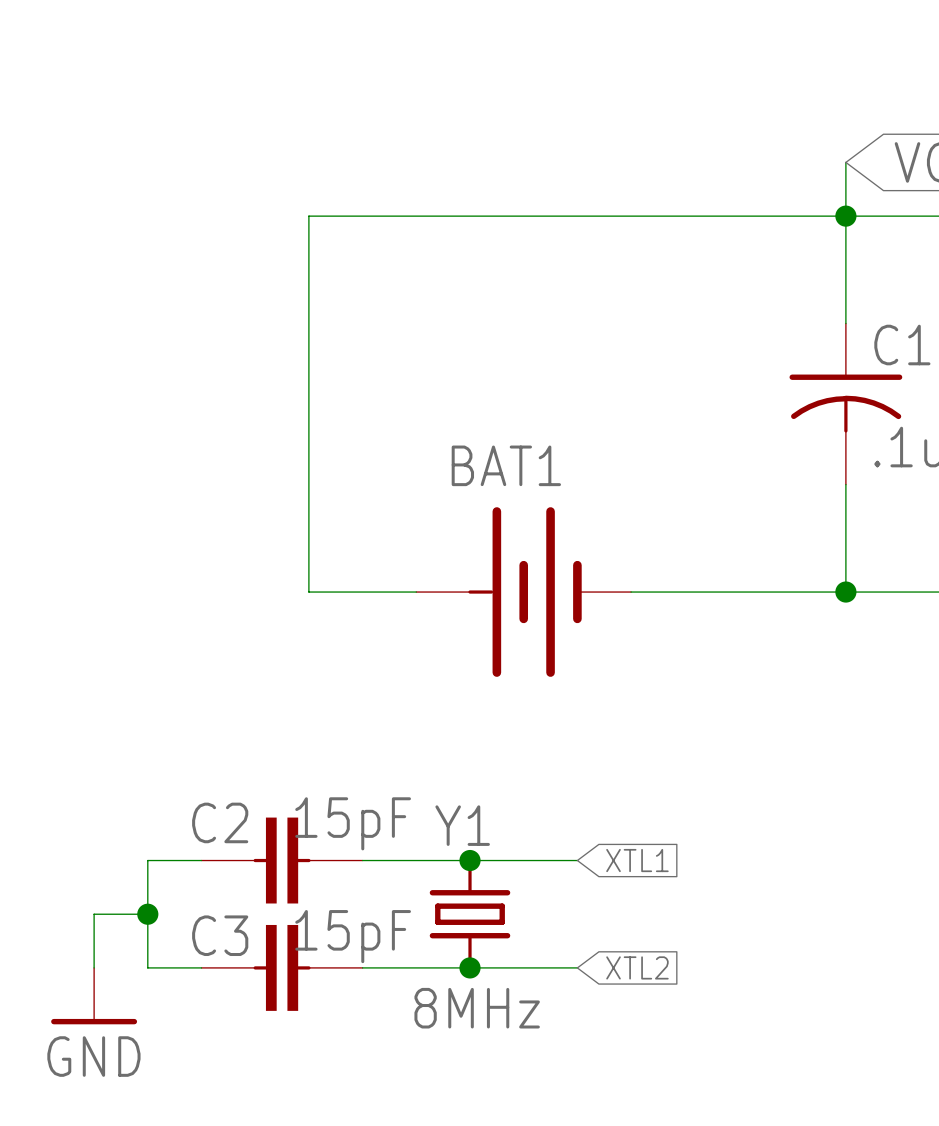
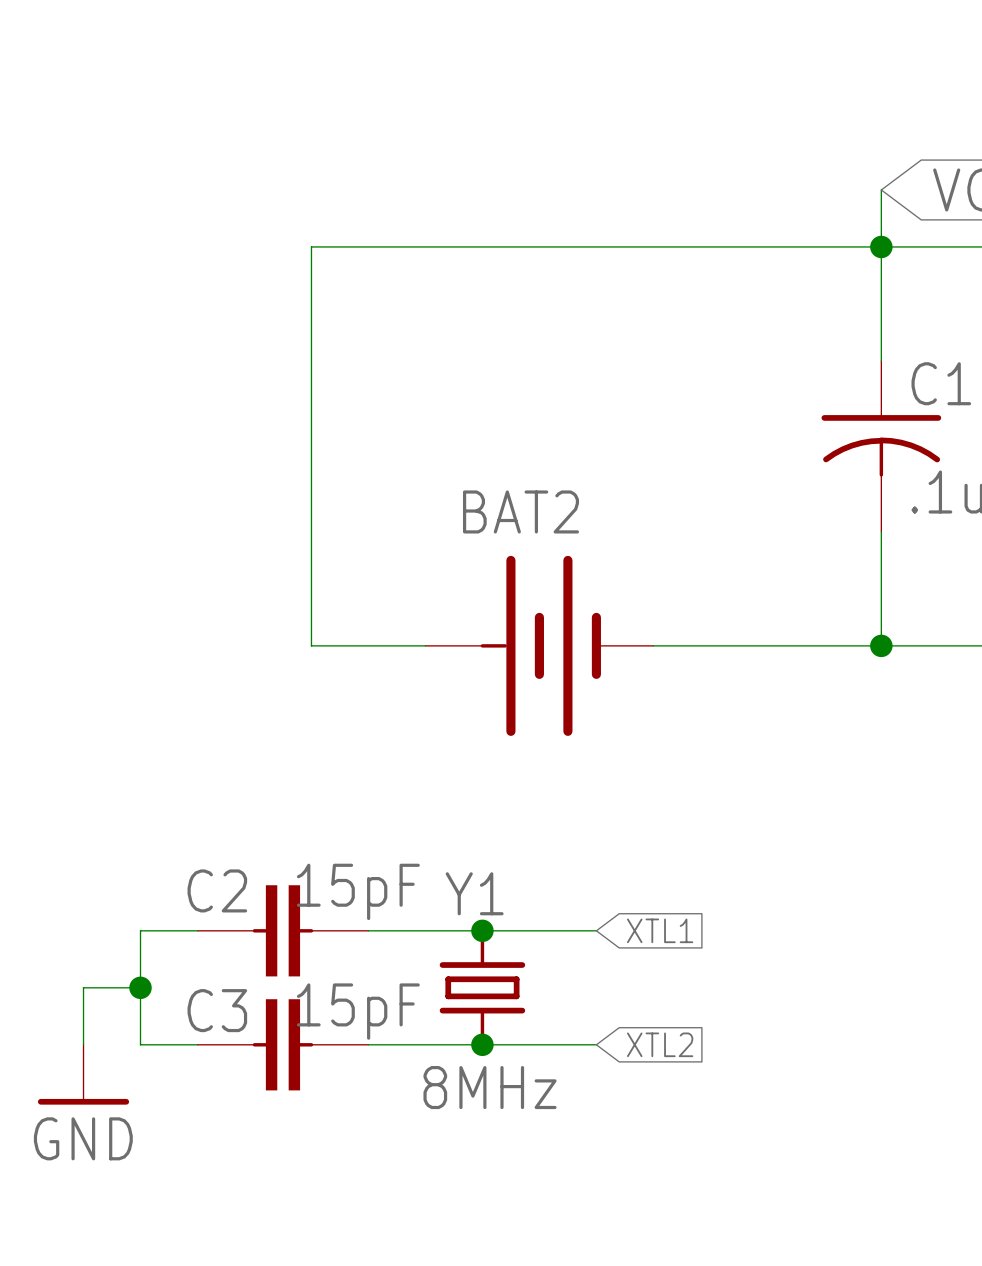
BAT1 name: BAT1 (506, 465) -> BAT2 (521, 511)

